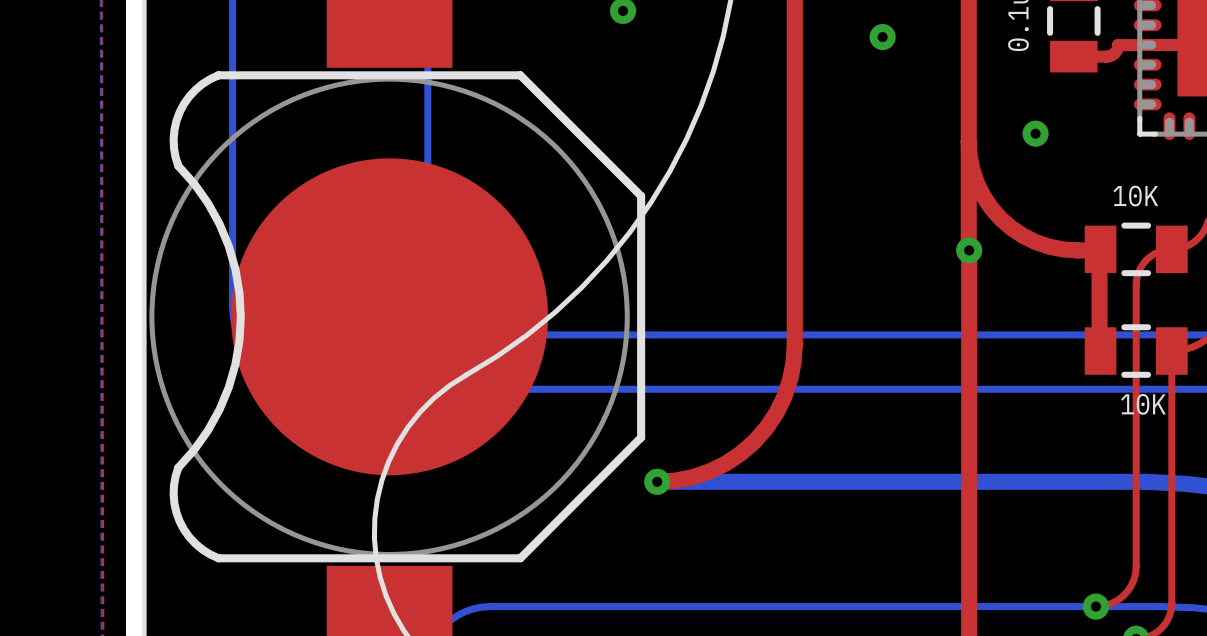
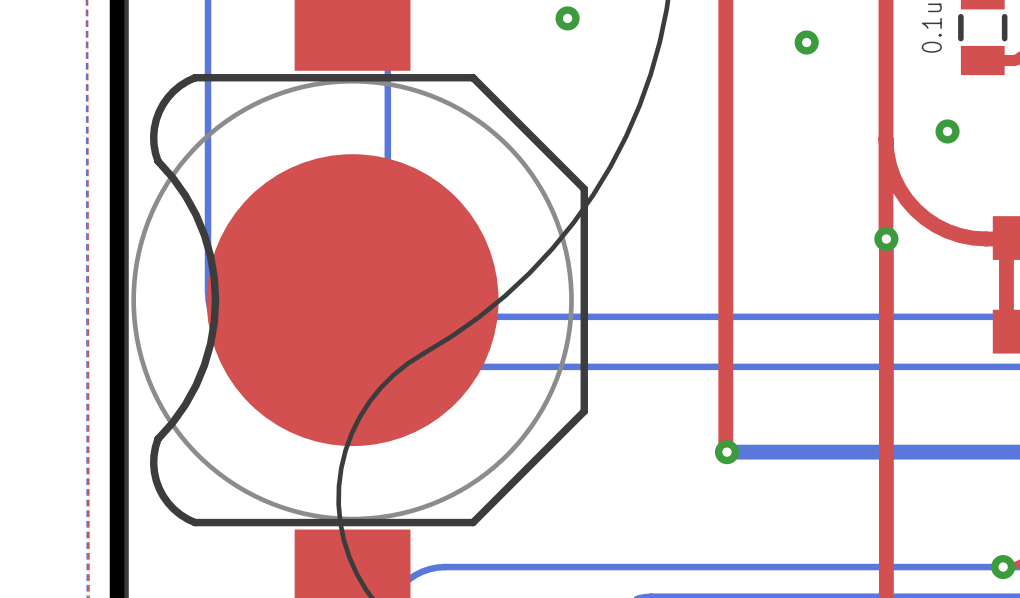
top track: (794, 344) (793, 362) (784, 396) (776, 413) (754, 441) (726, 463) (709, 471) (692, 477) (657, 481) -> (725, 325) (726, 452)
bottom track: (657, 481) (796, 481) -> none
via position: (657, 481) -> (726, 452)

